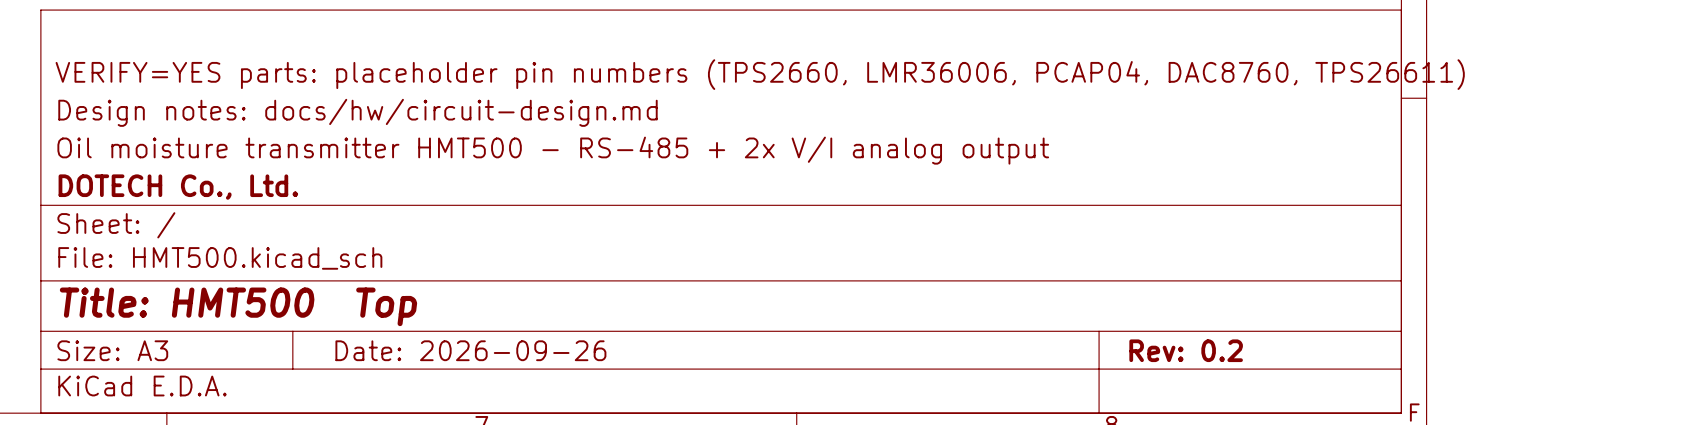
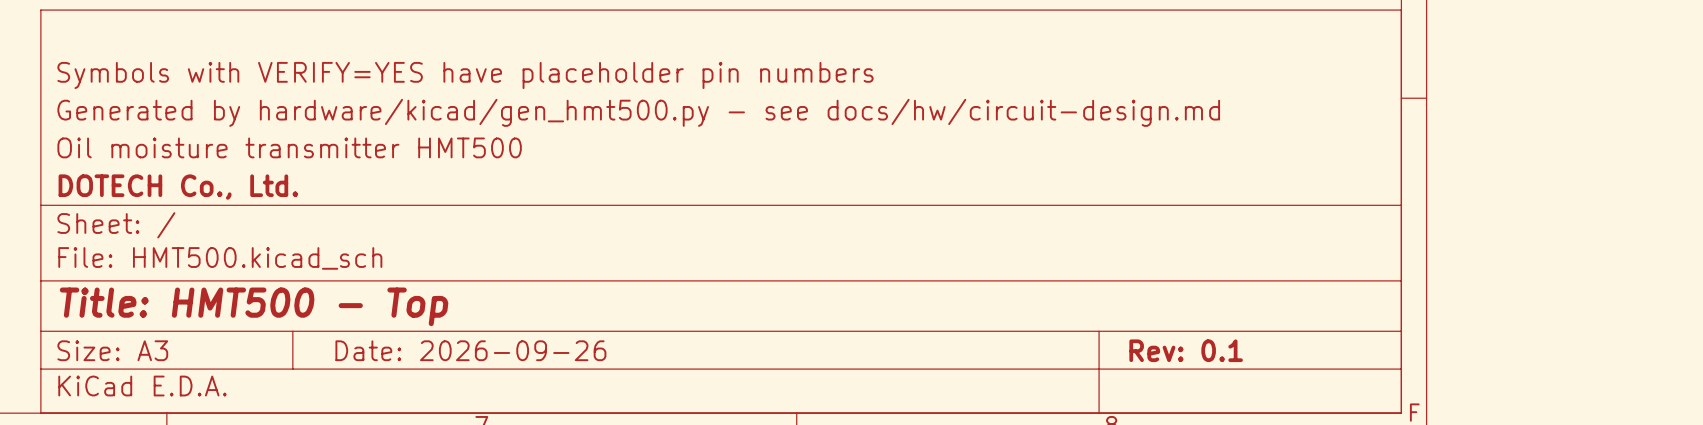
title block: VERIFY=YES parts: placeholder pin numbers (TPS2660, LMR36006, PCAP04, DAC8760, TPS26611) (760, 74) -> Symbols with VERIFY=YES have placeholder pin numbers (465, 75)
title block: Design notes: docs/hw/circuit-design.md (357, 112) -> Generated by hardware/kicad/gen_hmt500.py - see docs/hw/circuit-design.md (638, 112)
title block: Oil moisture transmitter HMT500 - RS-485 + 2x V/I analog output (553, 150) -> Oil moisture transmitter HMT500 (289, 147)
title block: Title: HMT500 Top (238, 306) -> Title: HMT500 - Top (254, 306)
title block: Rev: 0.2 (1186, 350) -> Rev: 0.1 (1186, 350)

